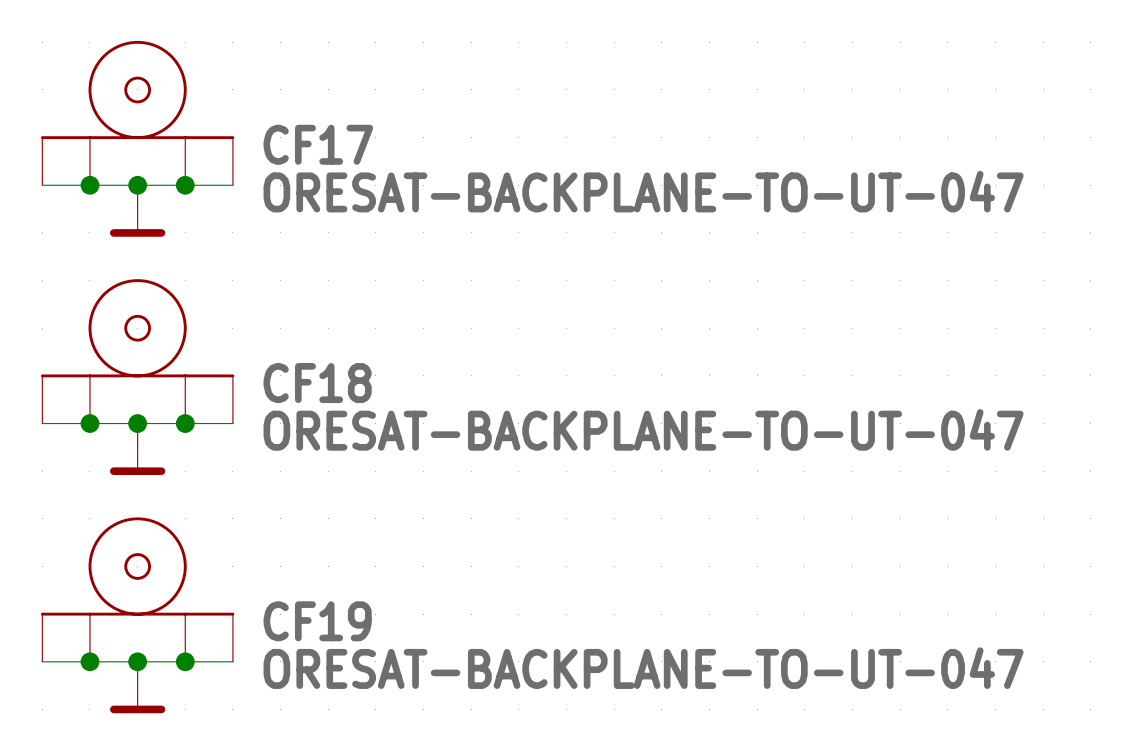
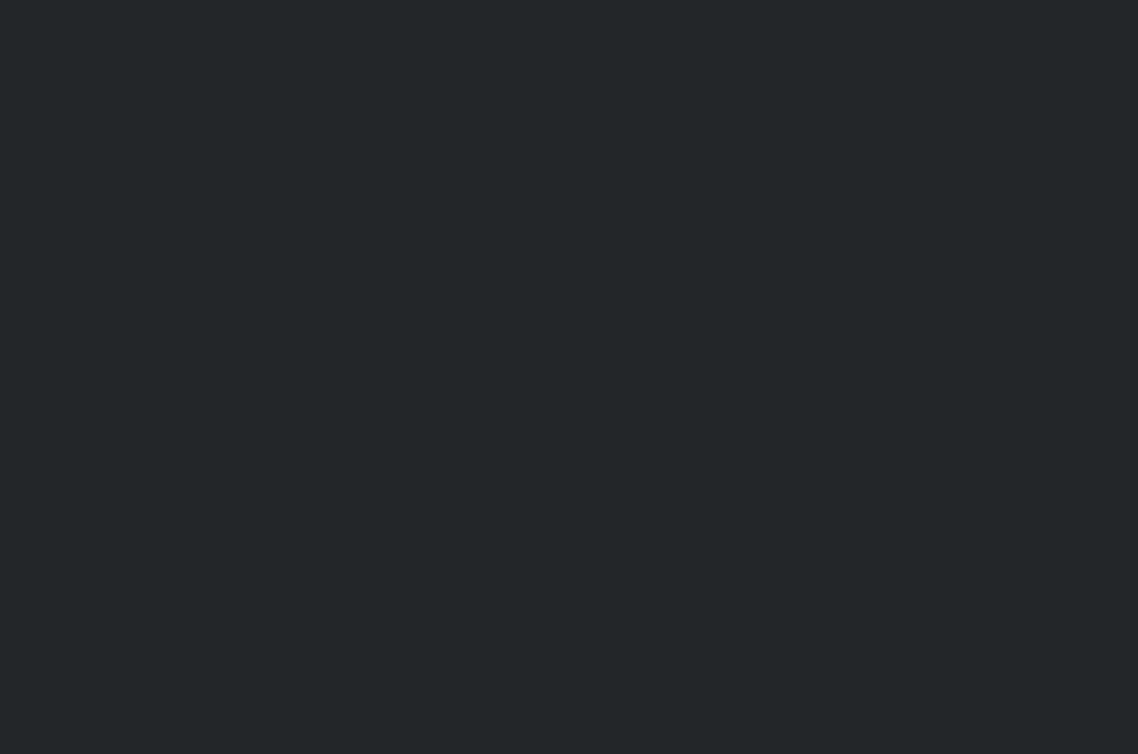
CF17: ORESAT-BACKPLANE-TO-UT-047 (137, 113) -> none
wire: (42, 185) (232, 185) -> none
junction: (89, 185) -> none
junction: (137, 185) -> none
junction: (185, 185) -> none
power symbol: (137, 211) -> none
CF18: ORESAT-BACKPLANE-TO-UT-047 (137, 351) -> none
wire: (42, 423) (232, 423) -> none
junction: (89, 423) -> none
junction: (137, 423) -> none
junction: (185, 423) -> none
power symbol: (137, 449) -> none
CF19: ORESAT-BACKPLANE-TO-UT-047 (137, 589) -> none
wire: (42, 661) (232, 661) -> none
junction: (89, 661) -> none
junction: (137, 661) -> none
junction: (185, 661) -> none
power symbol: (137, 687) -> none

